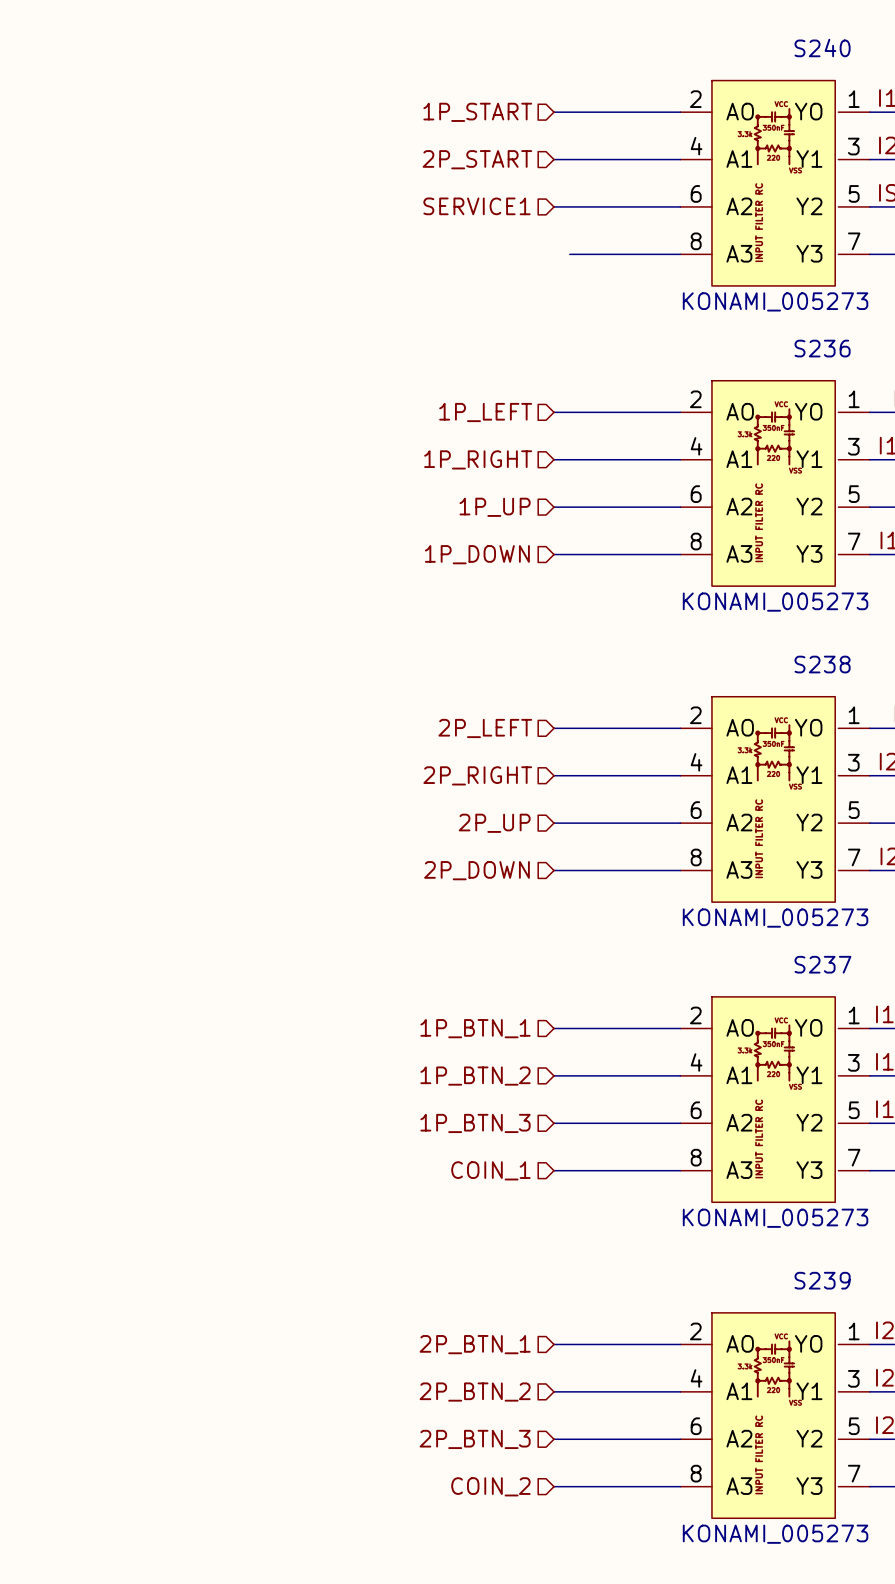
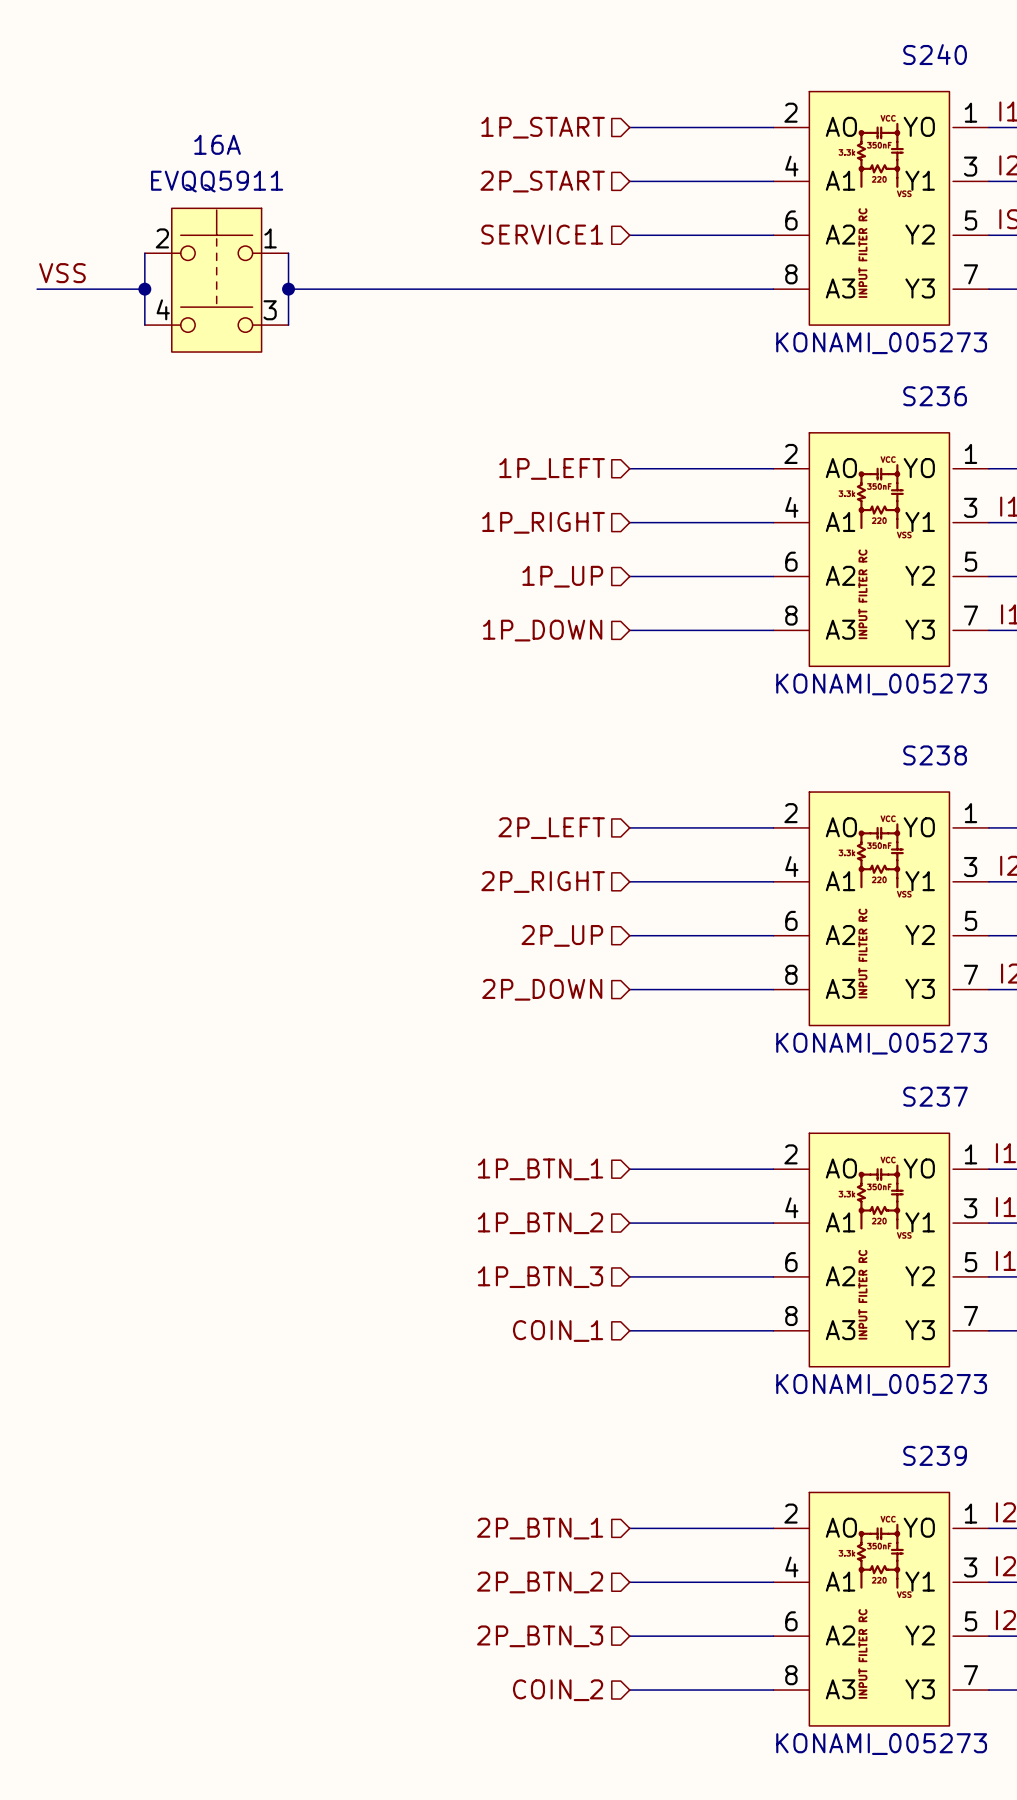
wire: none -> (144, 253) (144, 325)
wire: none -> (288, 253) (288, 325)
label: none -> VSS (62, 273)
16A: none -> EVQQ5911 (216, 280)
wire: none -> (37, 289) (144, 289)
junction: none -> (144, 289)
wire: none -> (288, 289) (647, 289)
junction: none -> (288, 289)

